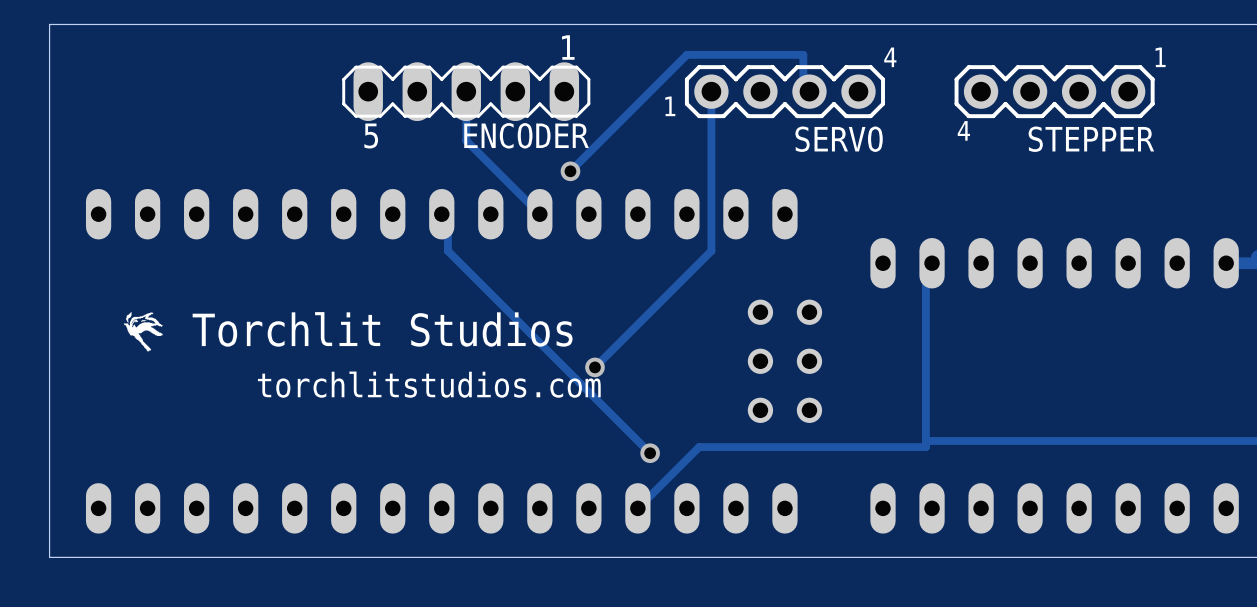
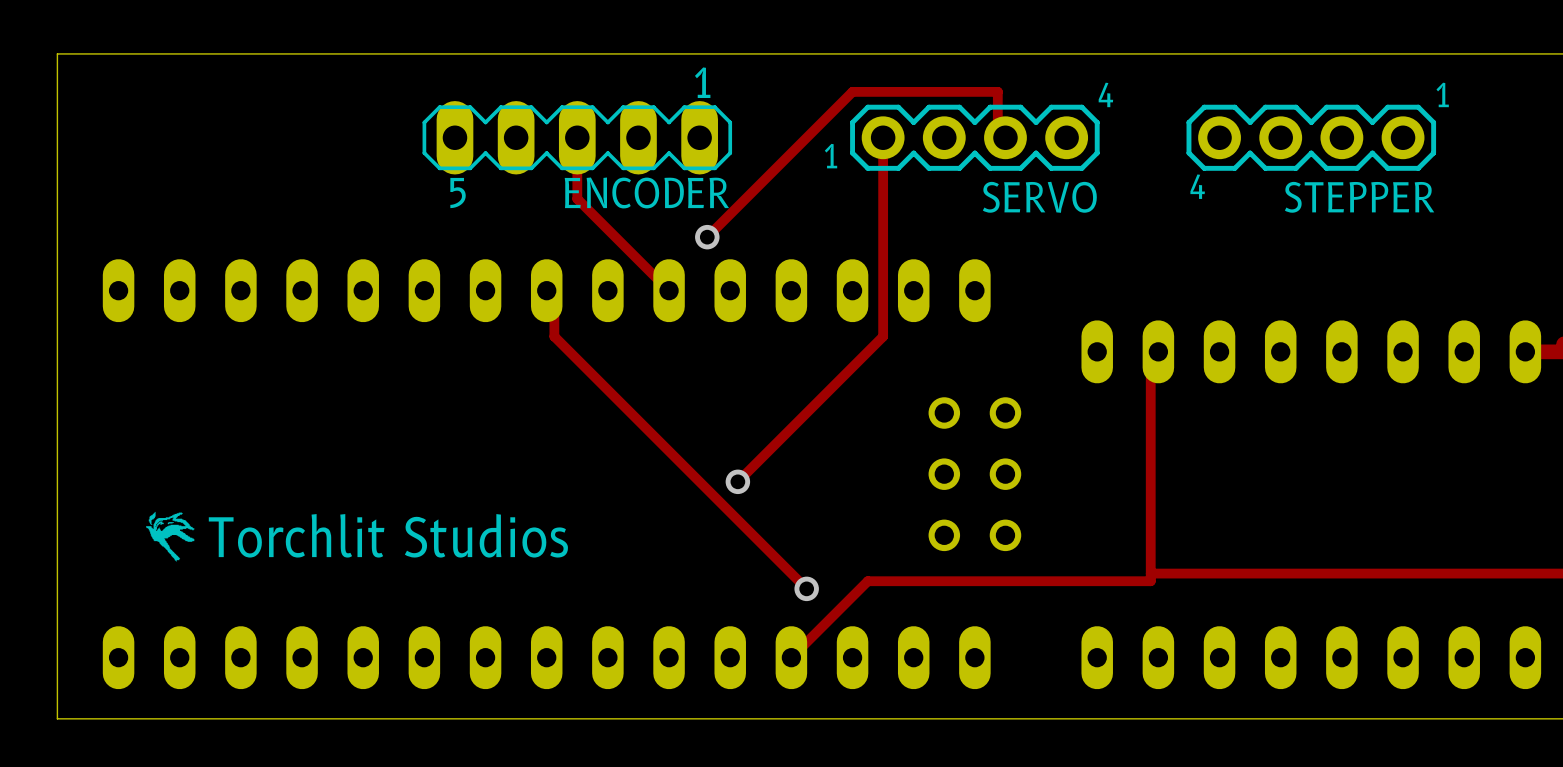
drawing: [123, 312, 163, 352] -> none
drawing position: (150, 323) -> (179, 526)
drawing position: (150, 324) -> (179, 527)
text position: Torchlit Studios (382, 329) -> Torchlit Studios (388, 535)
text: torchlitstudios.com (429, 384) -> none
drawing: none -> [146, 511, 195, 562]

